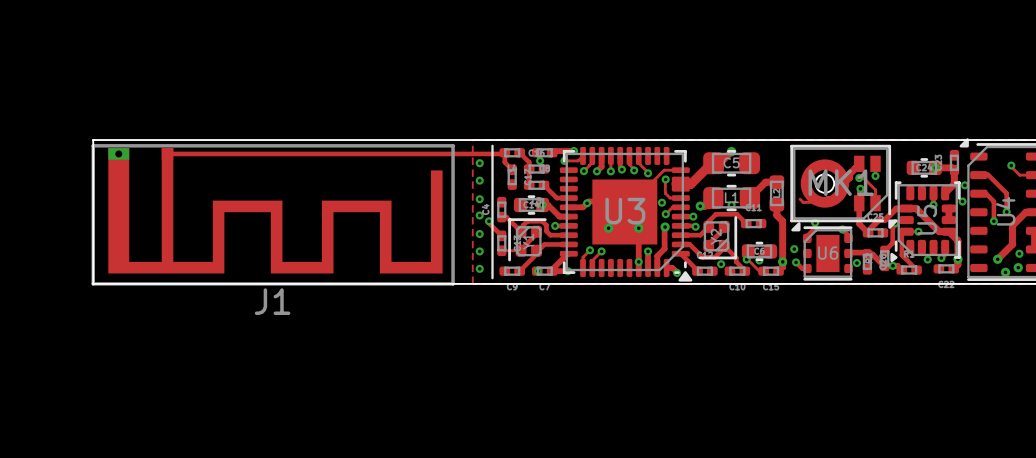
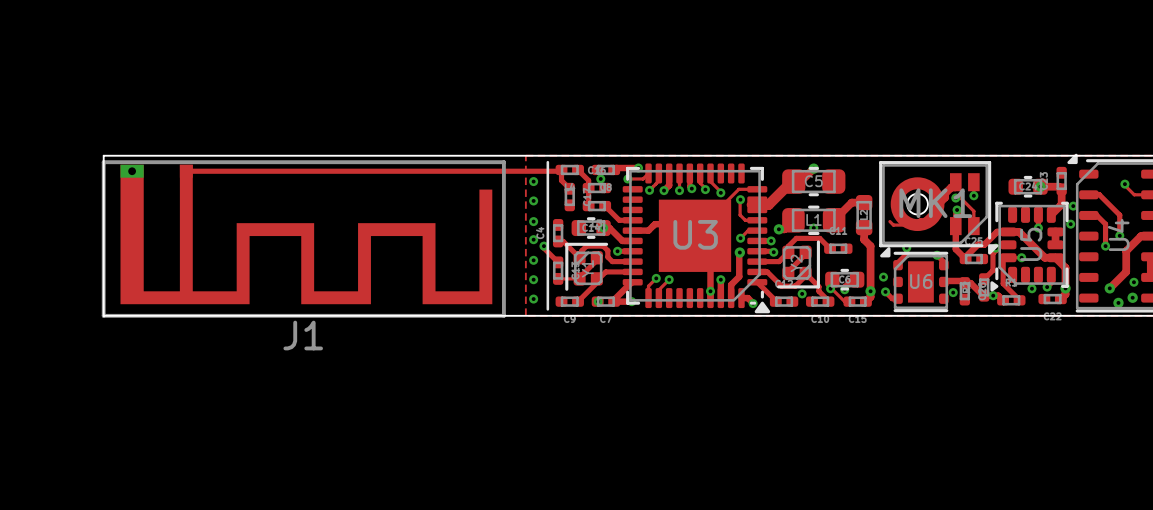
via: (661, 202) -> none
via: (587, 203) -> none
via: (608, 228) -> none
via: (638, 228) -> none

